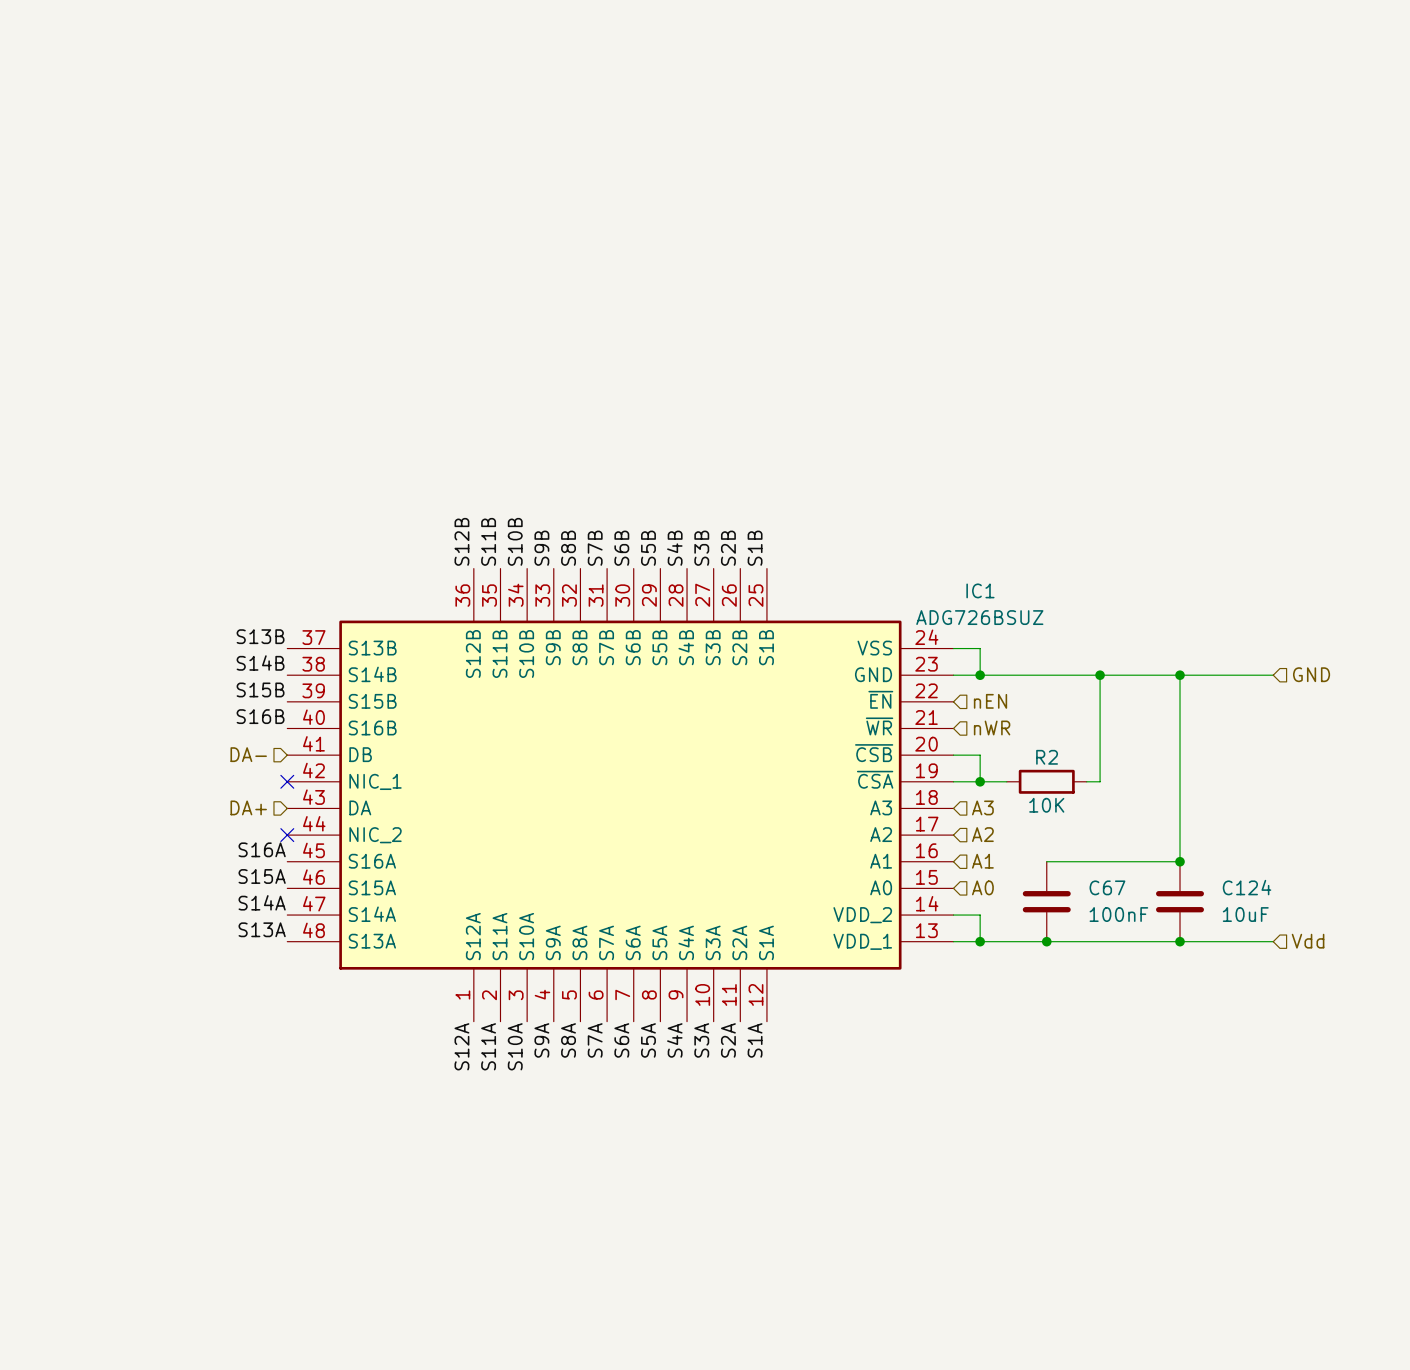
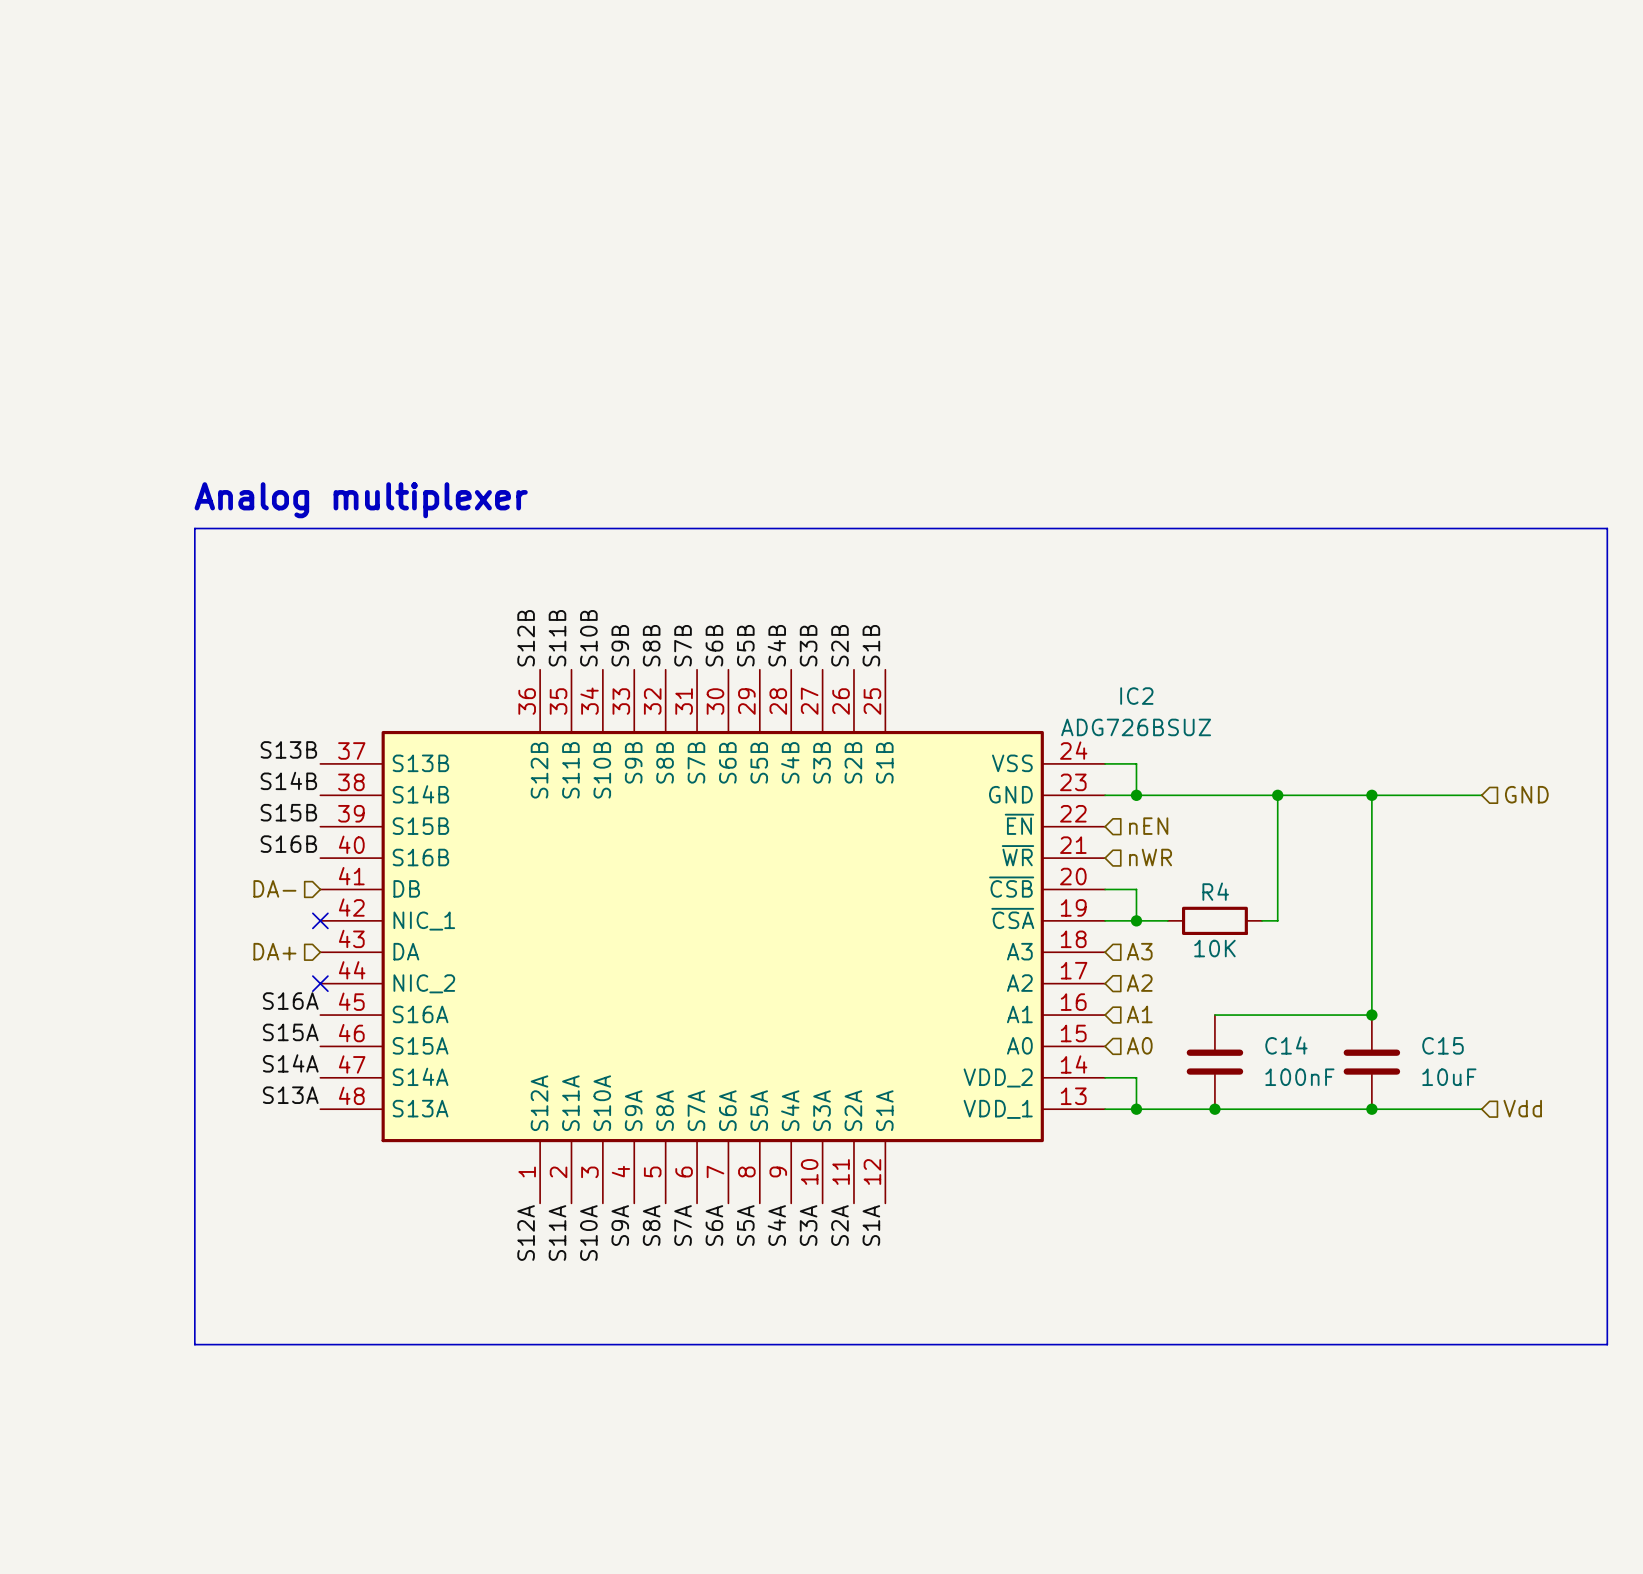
text: none -> Analog multiplexer (361, 500)
line: none -> (194, 528) (1607, 528) (1607, 1344) (194, 1344) (194, 528)
IC1 name: IC1 (980, 590) -> IC2 (1136, 696)
R2 name: R2 (1047, 757) -> R4 (1215, 891)
C67 name: C67 (1107, 887) -> C14 (1286, 1045)
C124 name: C124 (1247, 887) -> C15 (1443, 1045)

